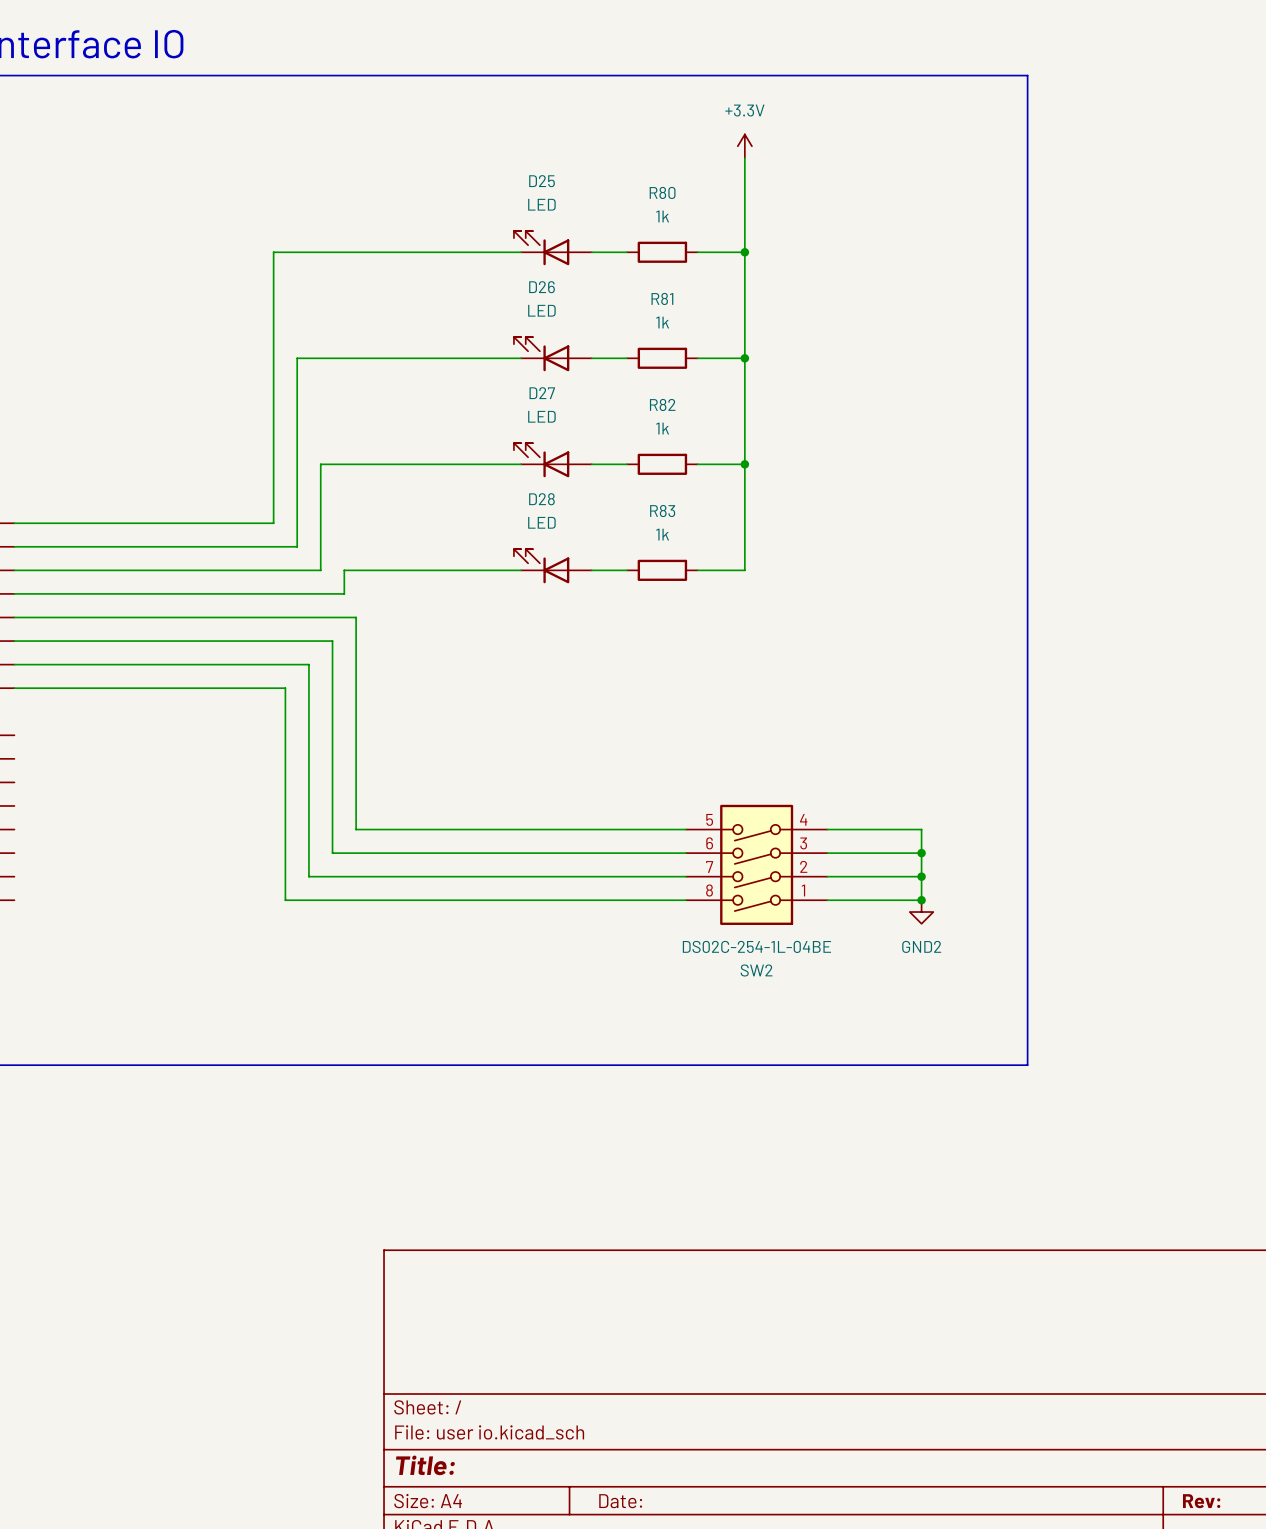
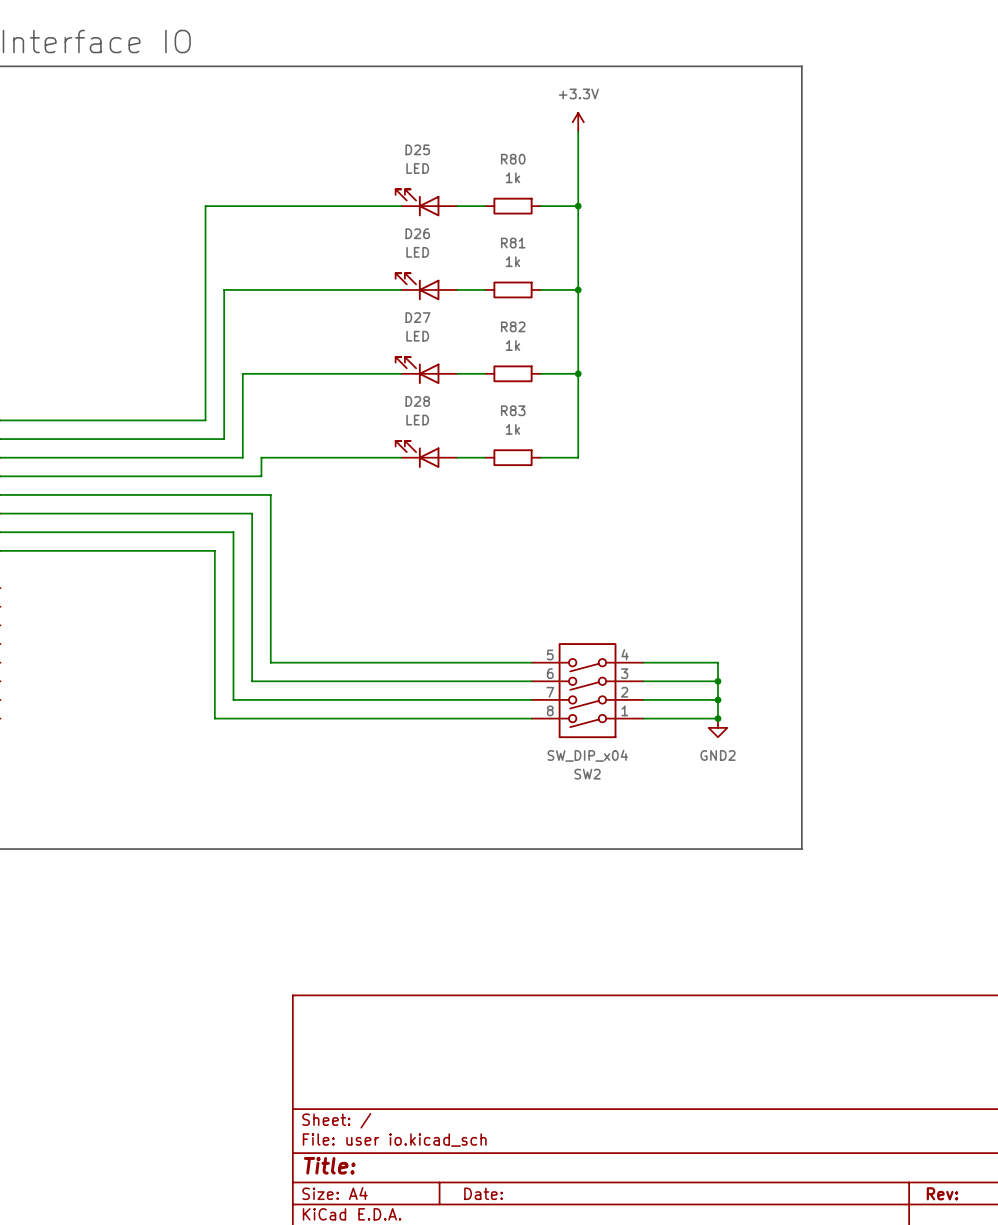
SW2 value: DS02C-254-1L-04BE (756, 946) -> SW_DIP_x04 (587, 755)

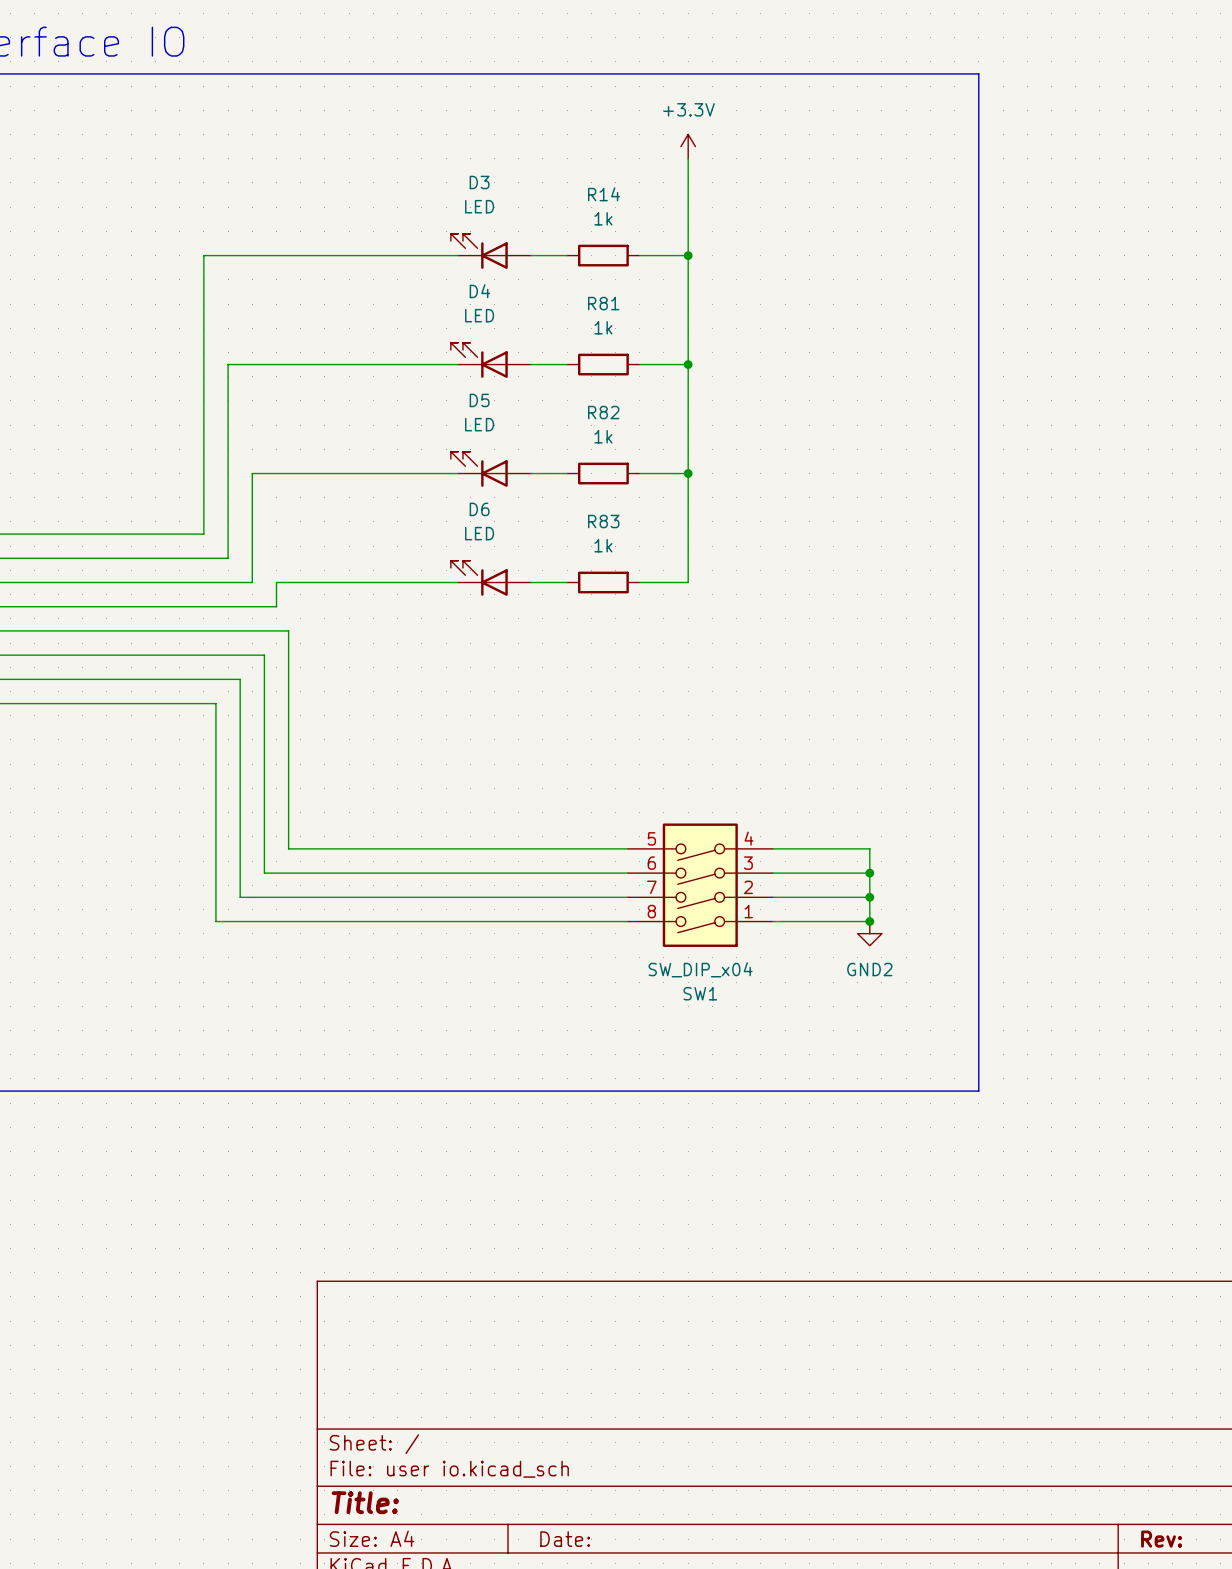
D25 name: D25 (417, 149) -> D3 (479, 182)
R80 name: R80 (513, 159) -> R14 (604, 194)
D26 name: D26 (417, 233) -> D4 (479, 291)
D27 name: D27 (417, 317) -> D5 (479, 400)
D28 name: D28 (417, 401) -> D6 (479, 509)
SW2 name: SW2 (587, 774) -> SW1 (700, 993)

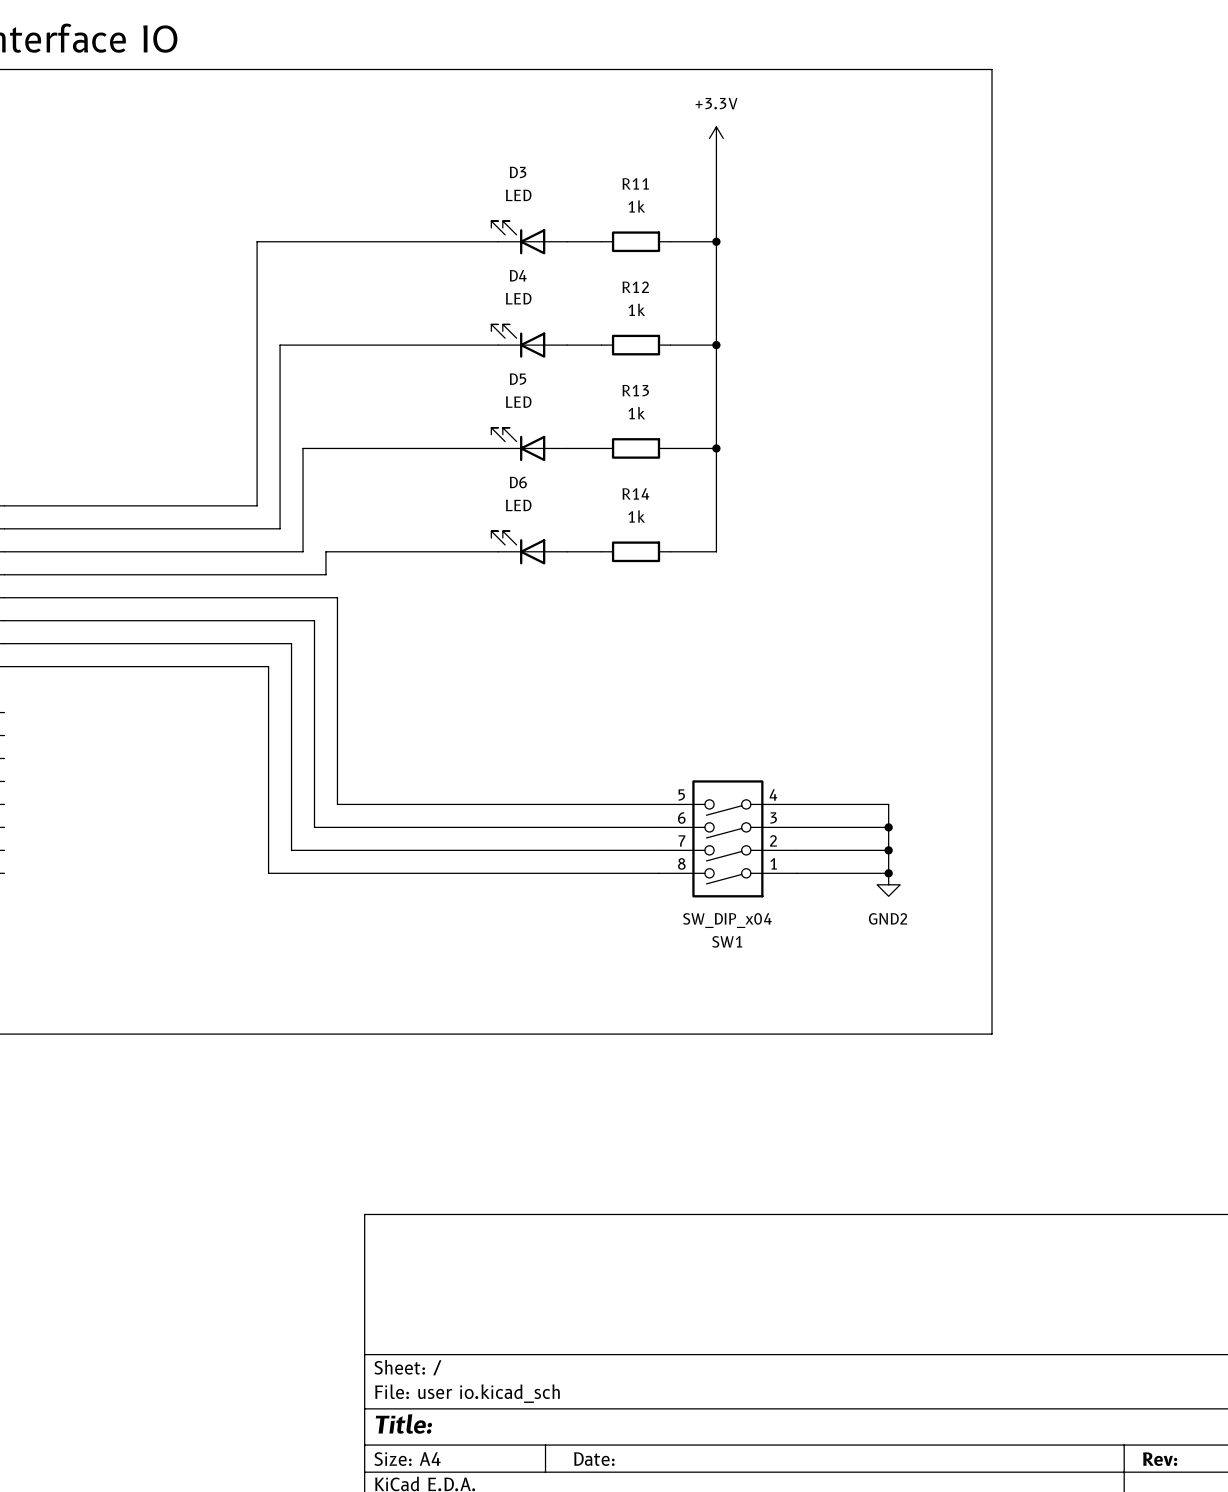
R14 name: R14 (604, 194) -> R11 (635, 183)
R81 name: R81 (603, 303) -> R12 (635, 287)
R82 name: R82 (603, 412) -> R13 (635, 390)
R83 name: R83 (603, 521) -> R14 (635, 493)

